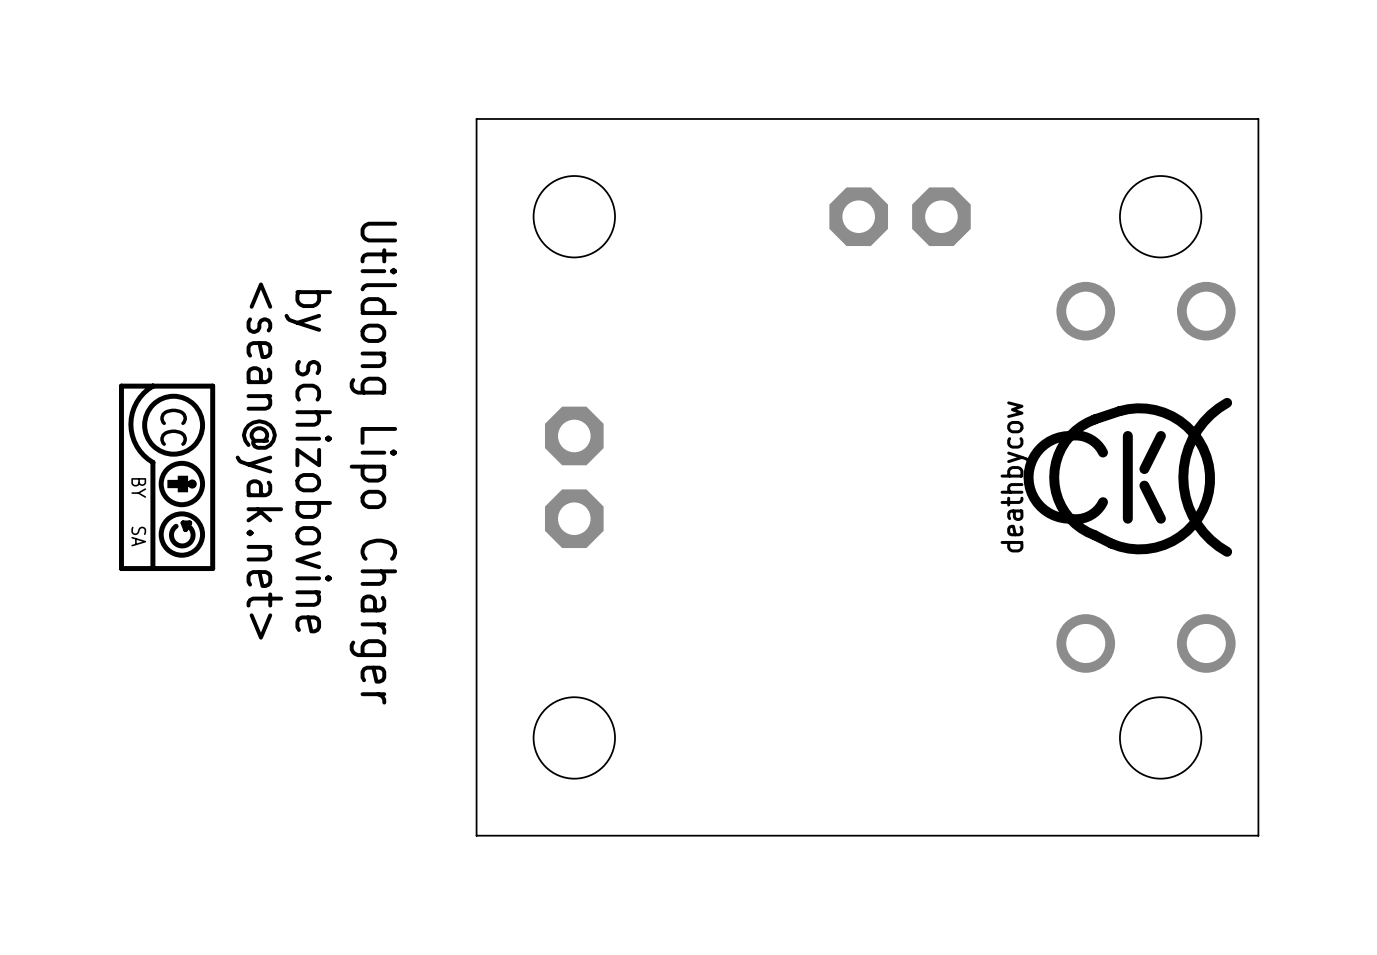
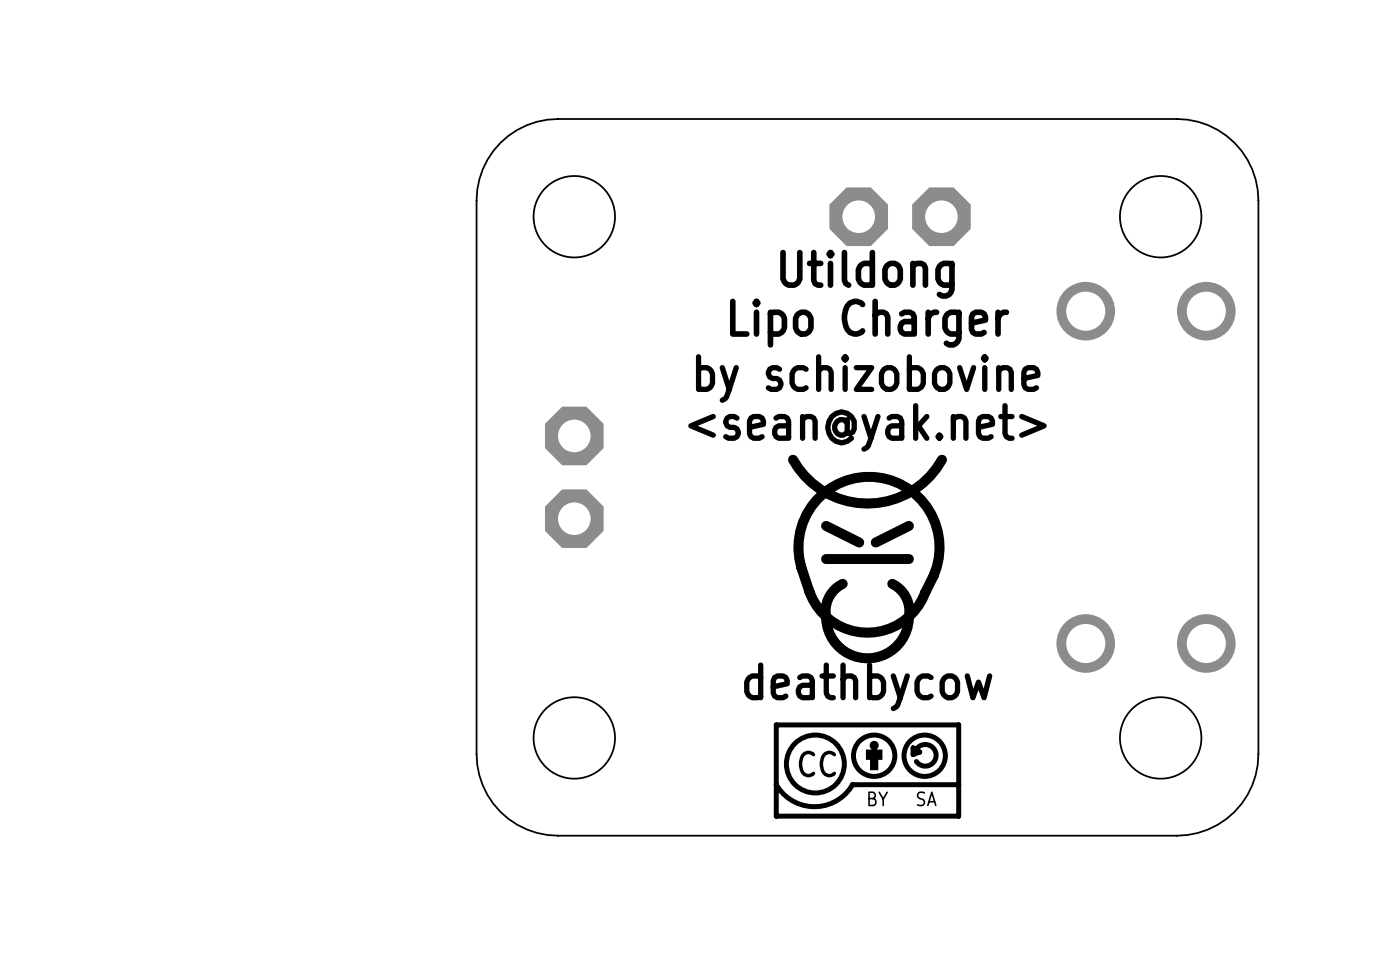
board edge: (558, 118) (476, 118) (476, 200) -> (558, 118) (526, 125) (500, 142) (482, 169) (476, 200)
board edge: (1176, 118) (1258, 118) (1258, 200) -> (1176, 118) (1208, 125) (1234, 142) (1252, 169) (1258, 200)
text: none -> Utildong (867, 274)
text: none -> Lipo Charger (869, 323)
text: none -> by schizobovine (868, 378)
drawing: [118, 383, 216, 572] -> none
drawing: [1023, 397, 1233, 557] -> none
text: none -> <sean@yak.net> (867, 427)
drawing: none -> [773, 454, 962, 819]
text: <sean@yak.net> (259, 461) -> none
text: by schizobovine (308, 461) -> none
text: Utildong Lipo Charger (373, 463) -> none
board edge: (476, 754) (476, 835) (558, 835) -> (476, 754) (482, 785) (500, 811) (526, 829) (558, 835)
board edge: (1258, 754) (1258, 835) (1176, 835) -> (1258, 754) (1252, 785) (1234, 811) (1208, 829) (1176, 835)

